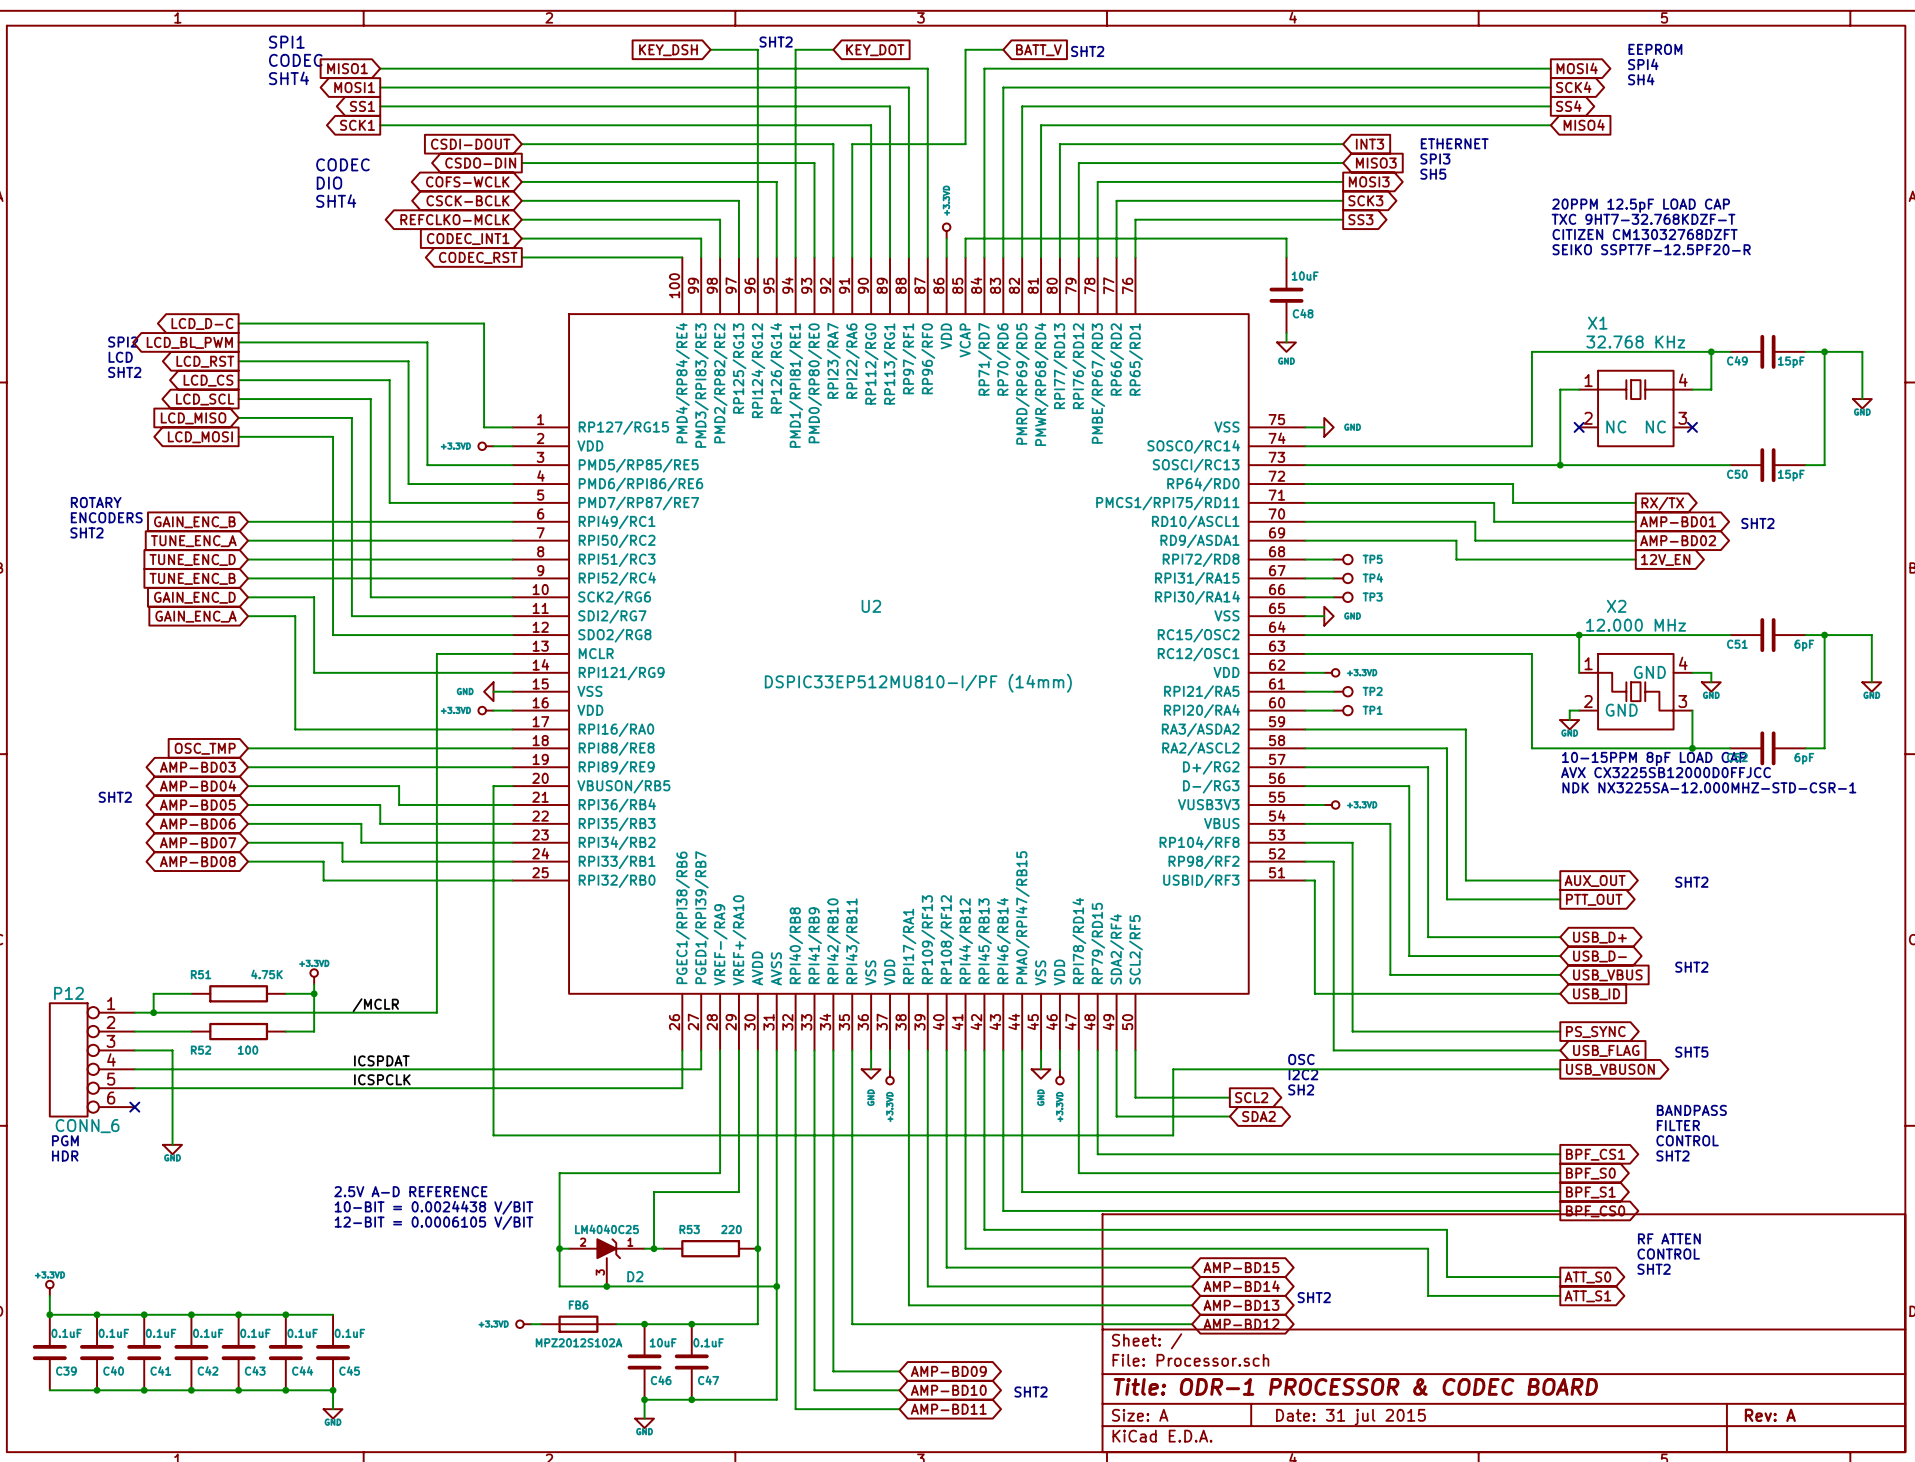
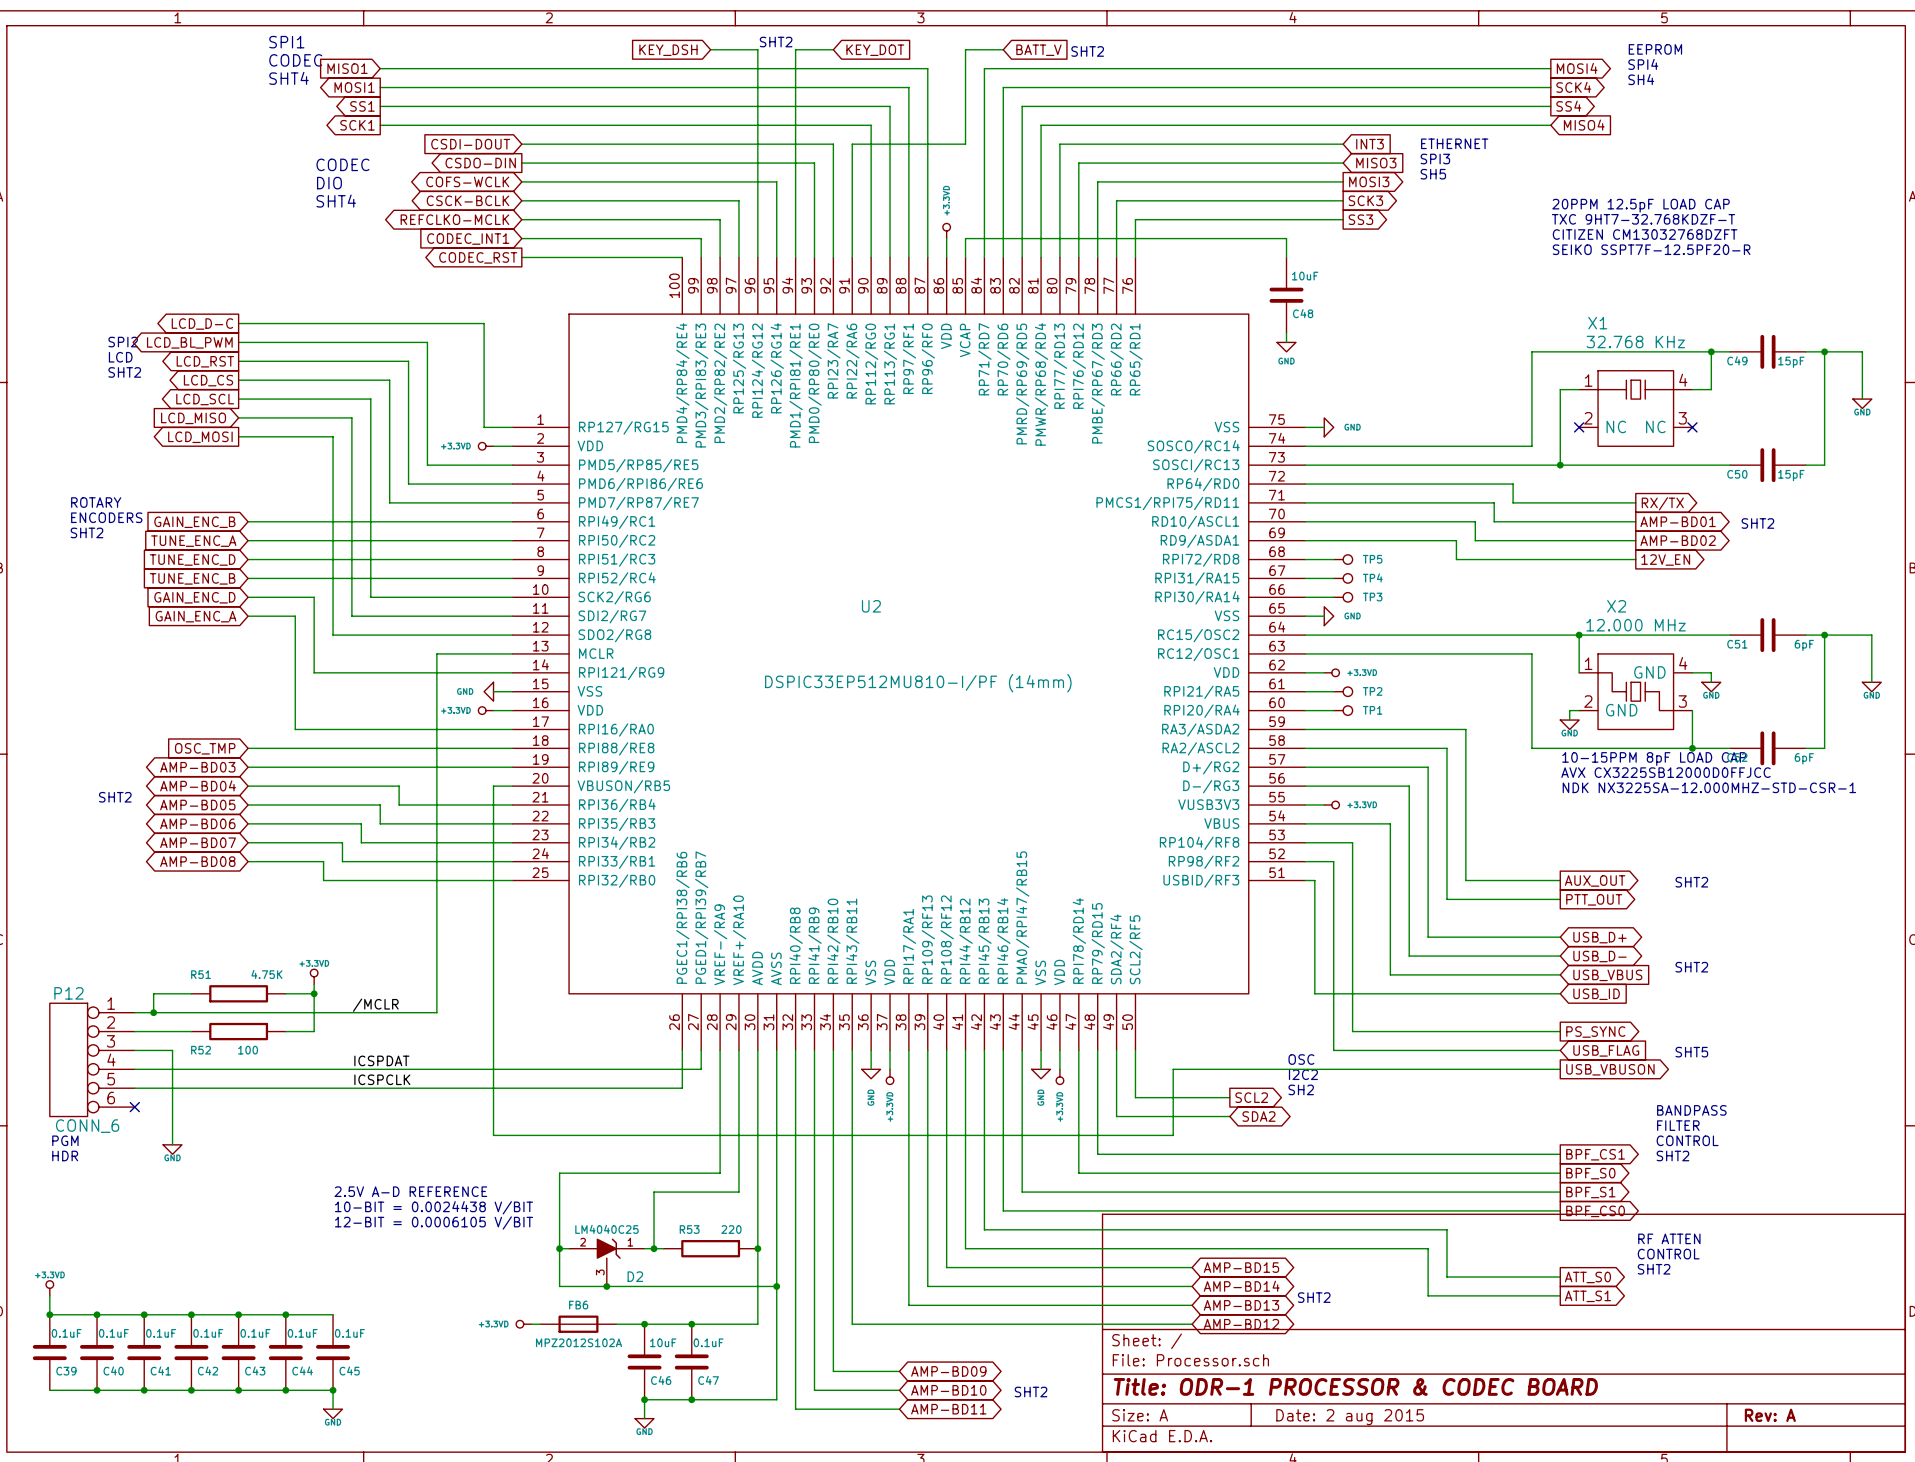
title block: Date: 31 jul 2015 (1350, 1417) -> Date: 2 aug 2015 (1350, 1417)

